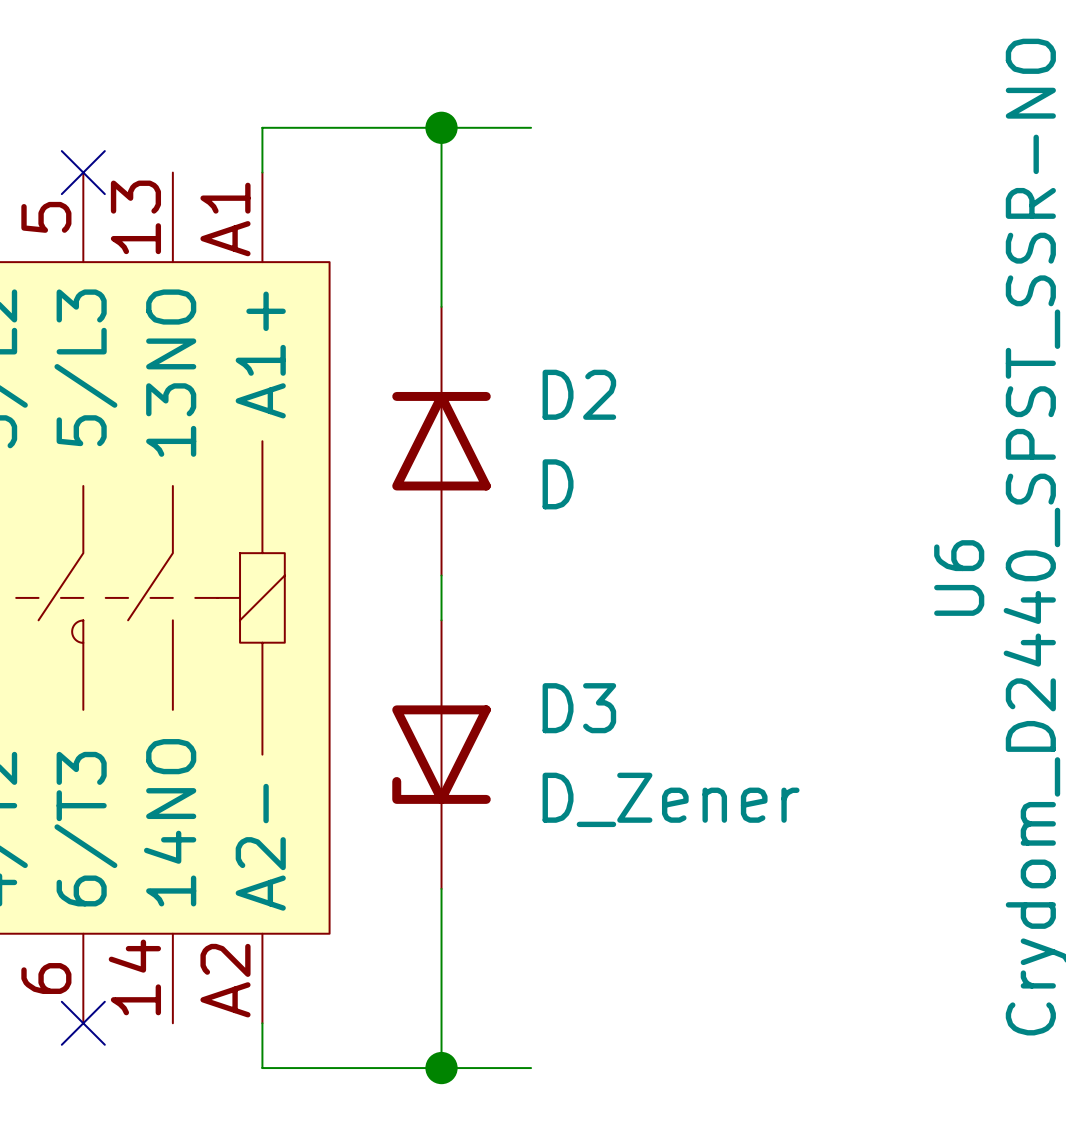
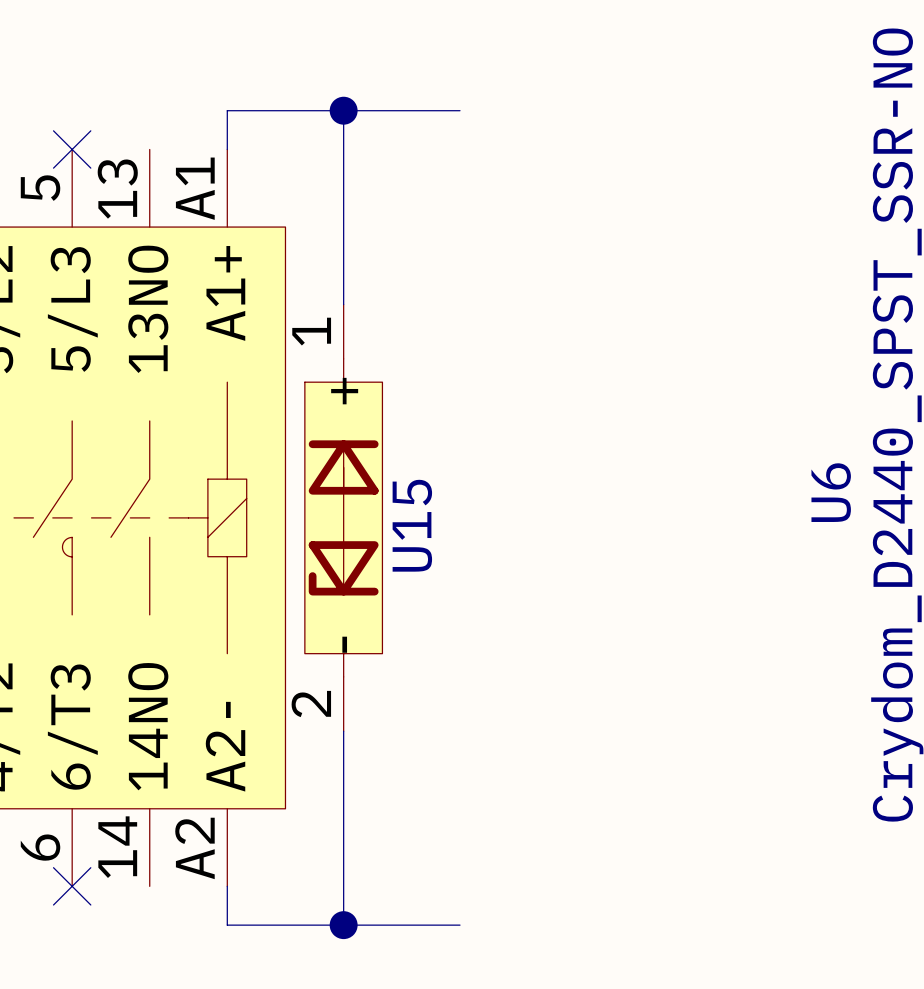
wire: none -> (343, 110) (343, 304)
wire: (441, 127) (441, 306) -> none
junction position: (441, 127) -> (343, 110)
D2: D (441, 441) -> none
U15: none -> (343, 517)
D3: D_Zener (441, 754) -> none
wire: none -> (343, 731) (343, 925)
wire: (441, 888) (441, 1068) -> none
junction position: (441, 1068) -> (343, 925)

